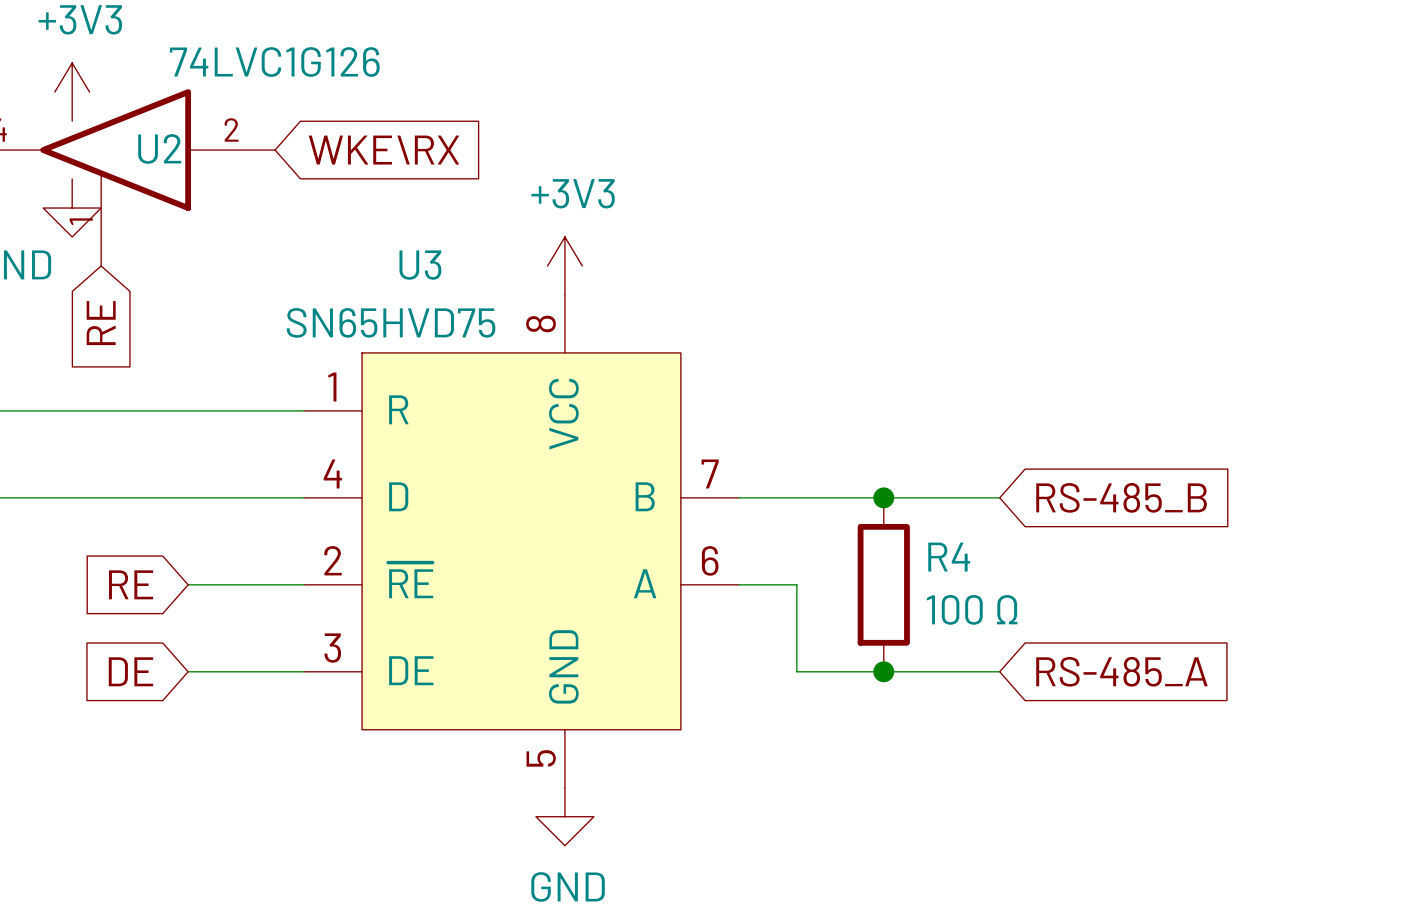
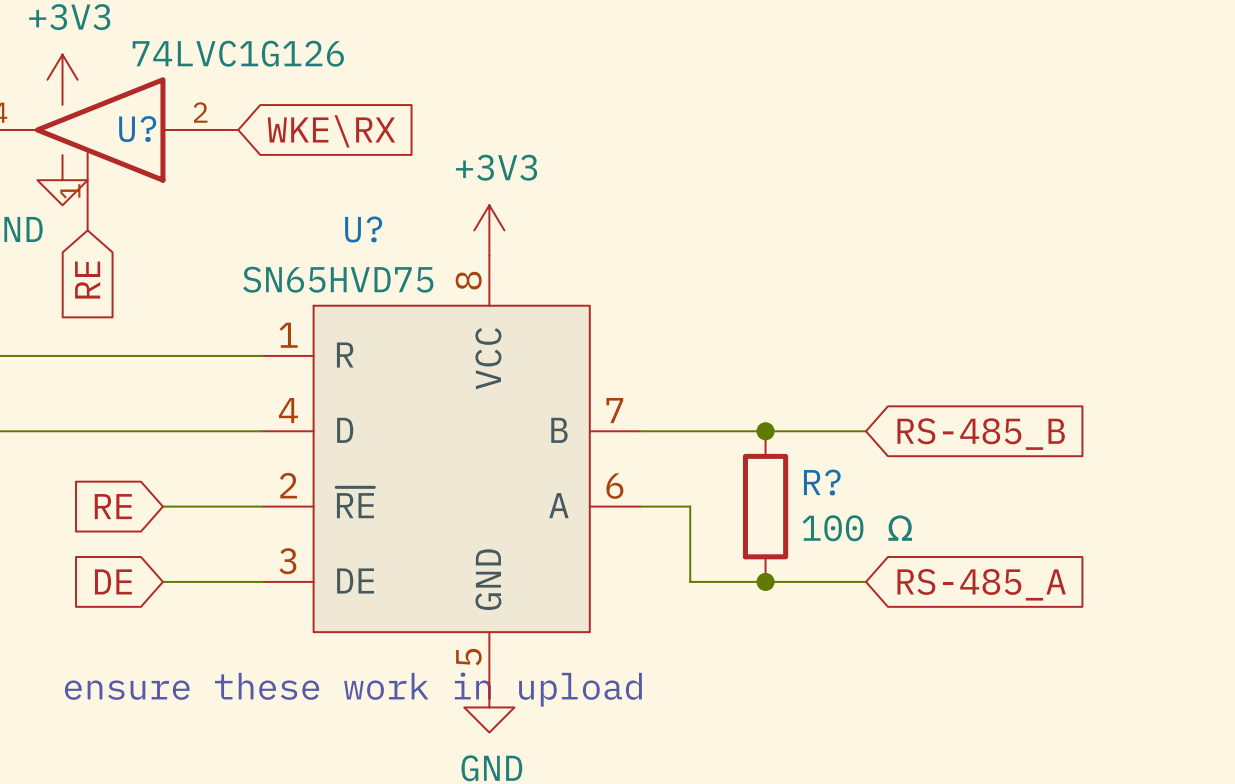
U2 name: U2 (159, 148) -> U? (137, 129)
U3 name: U3 (420, 265) -> U? (363, 229)
R4 name: R4 (949, 557) -> R? (822, 482)
text: none -> ensure these work in upload (353, 689)

